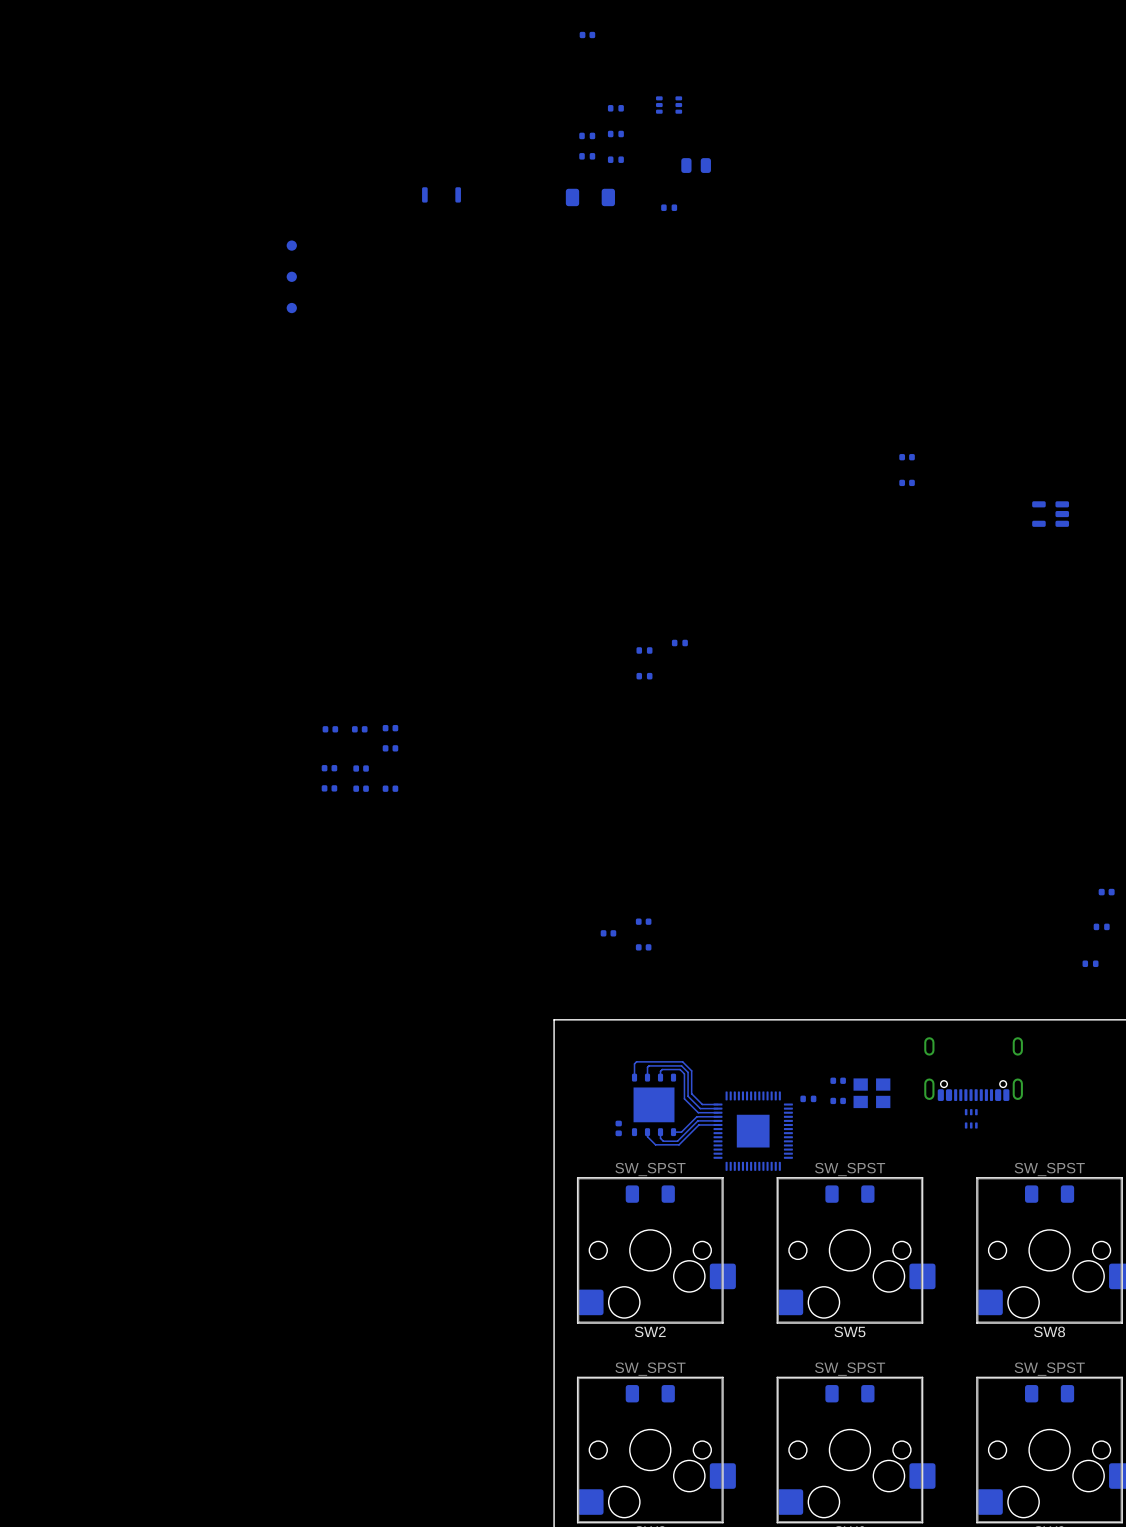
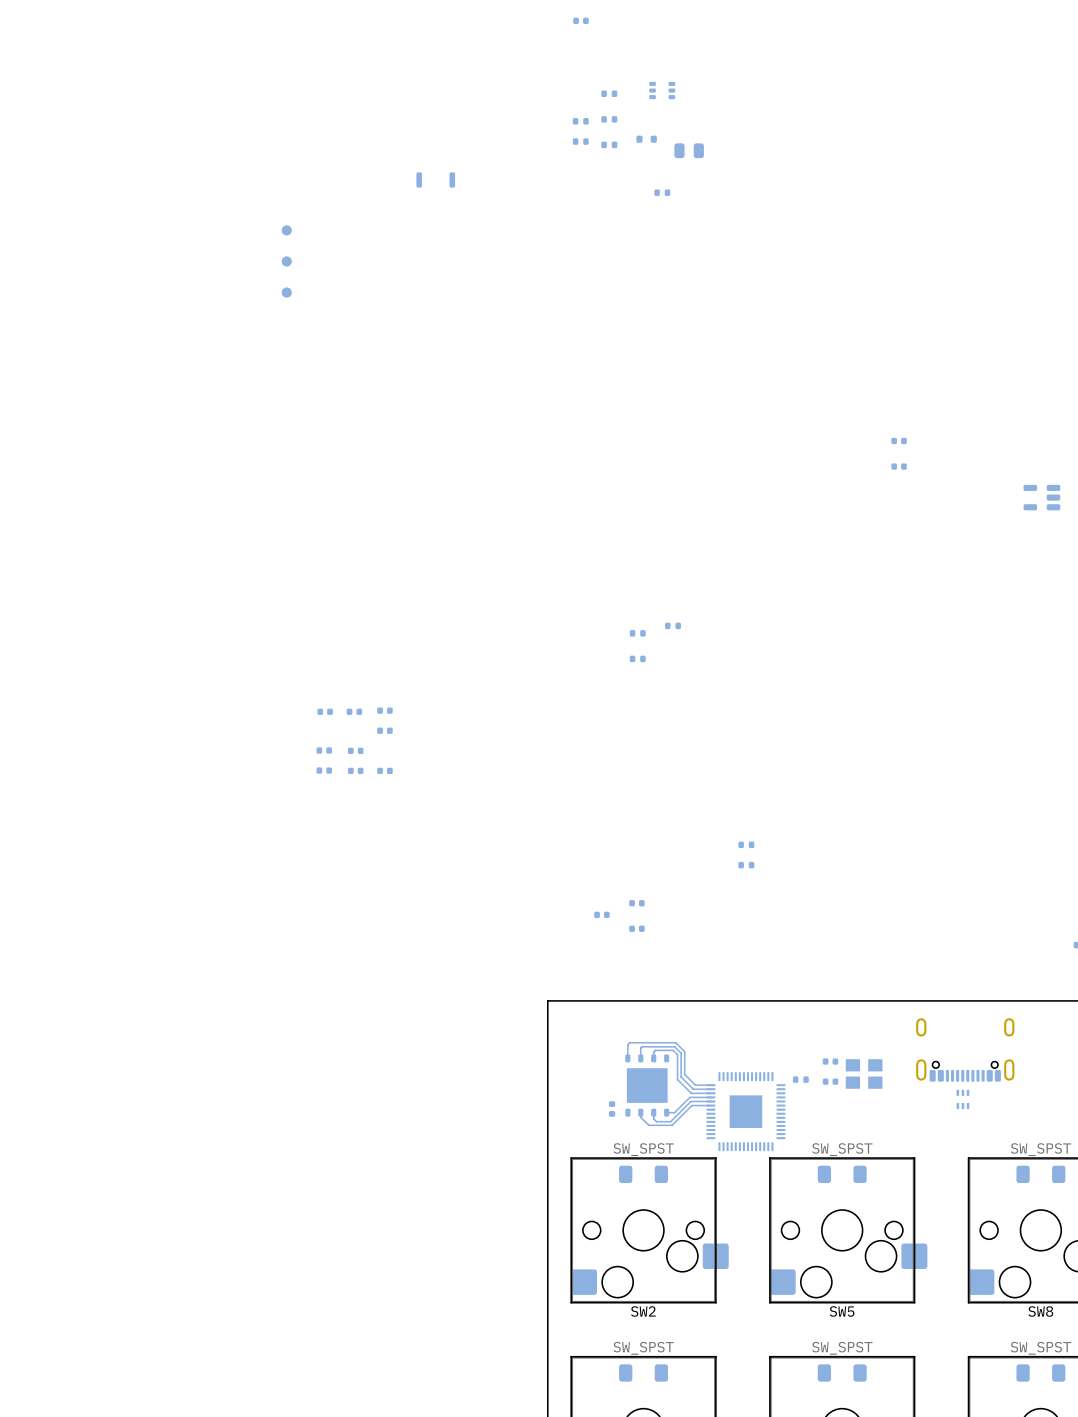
part: none -> (646, 139)
part: (590, 197) -> none
part: none -> (746, 844)
part: none -> (746, 865)

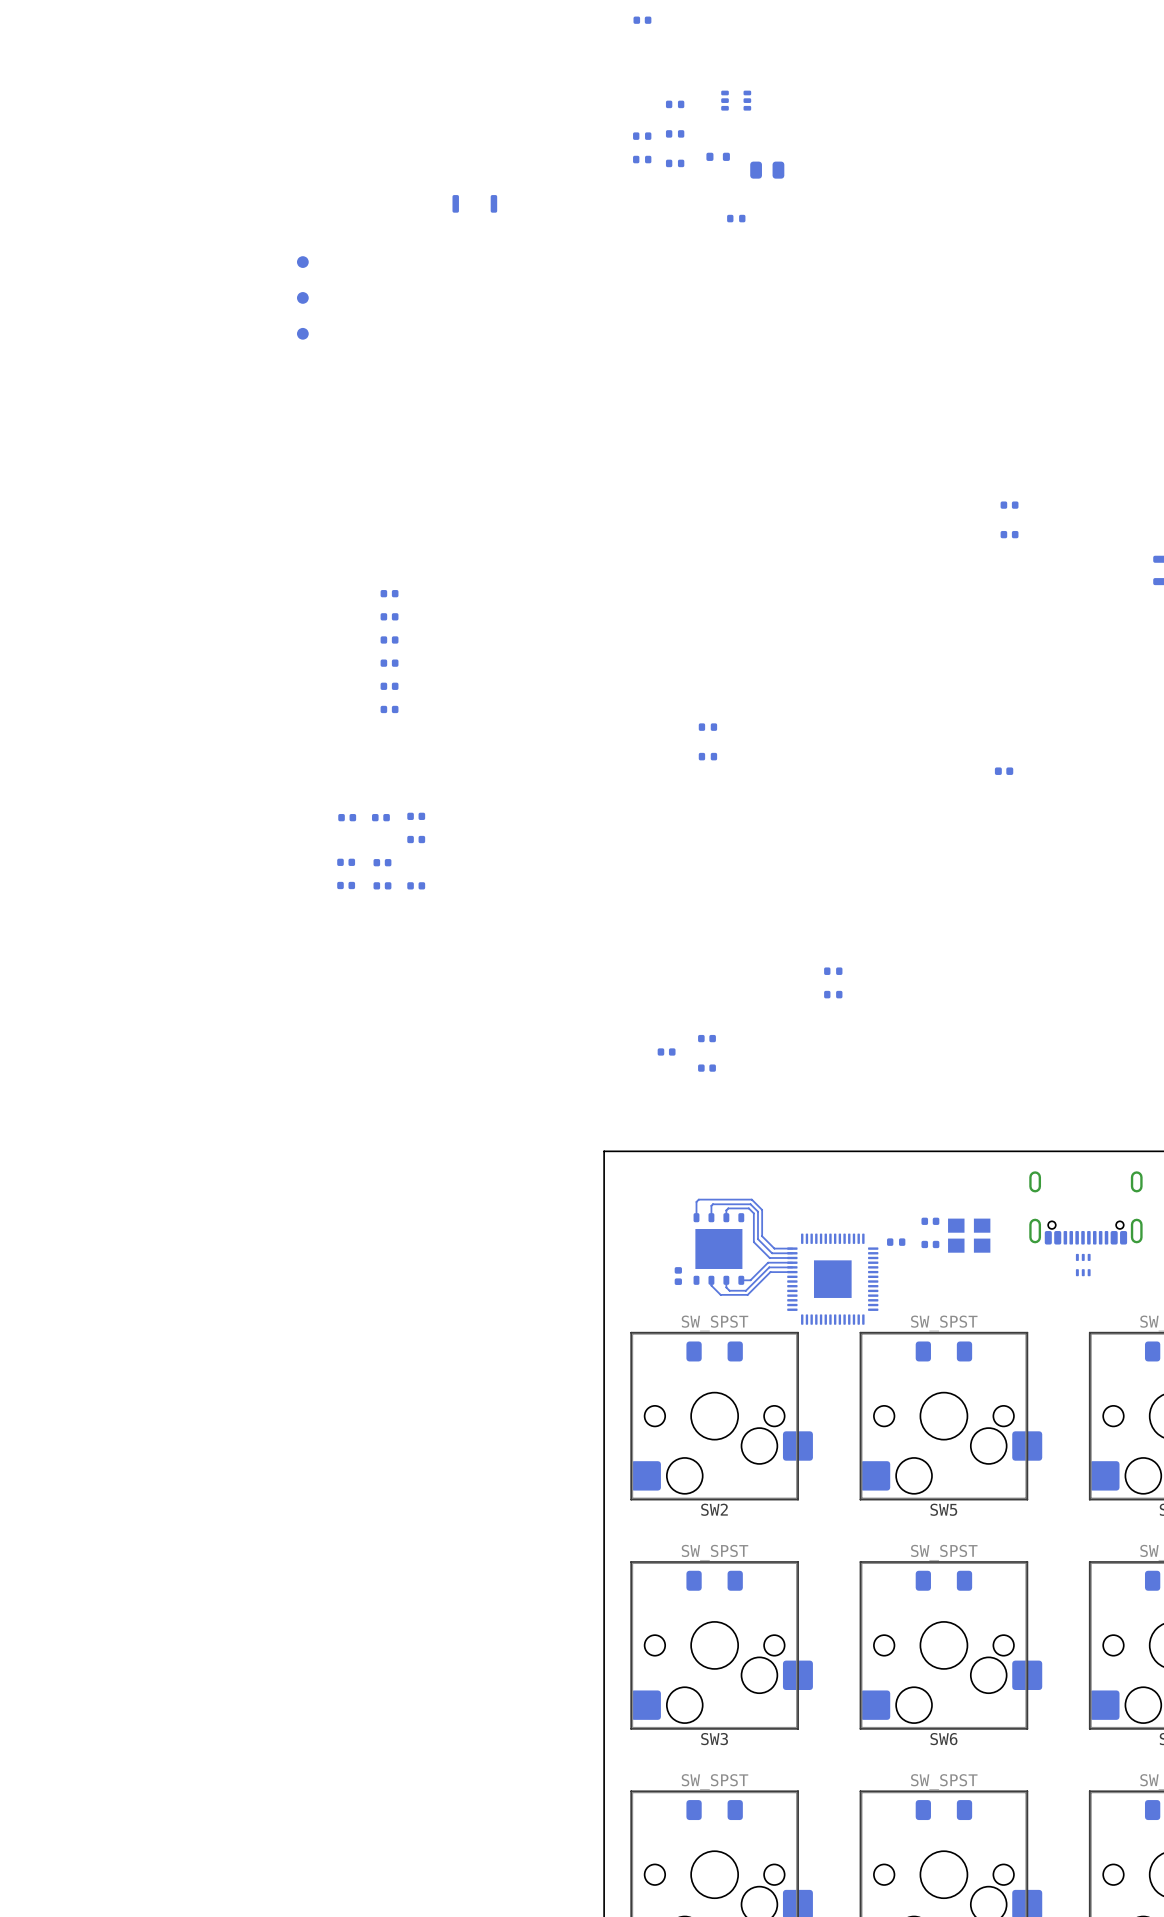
part: none -> (389, 593)
part: none -> (389, 616)
part: none -> (389, 639)
part: none -> (389, 663)
part: none -> (389, 686)
part: none -> (389, 709)
part: (673, 625) -> none
part: none -> (1004, 771)

